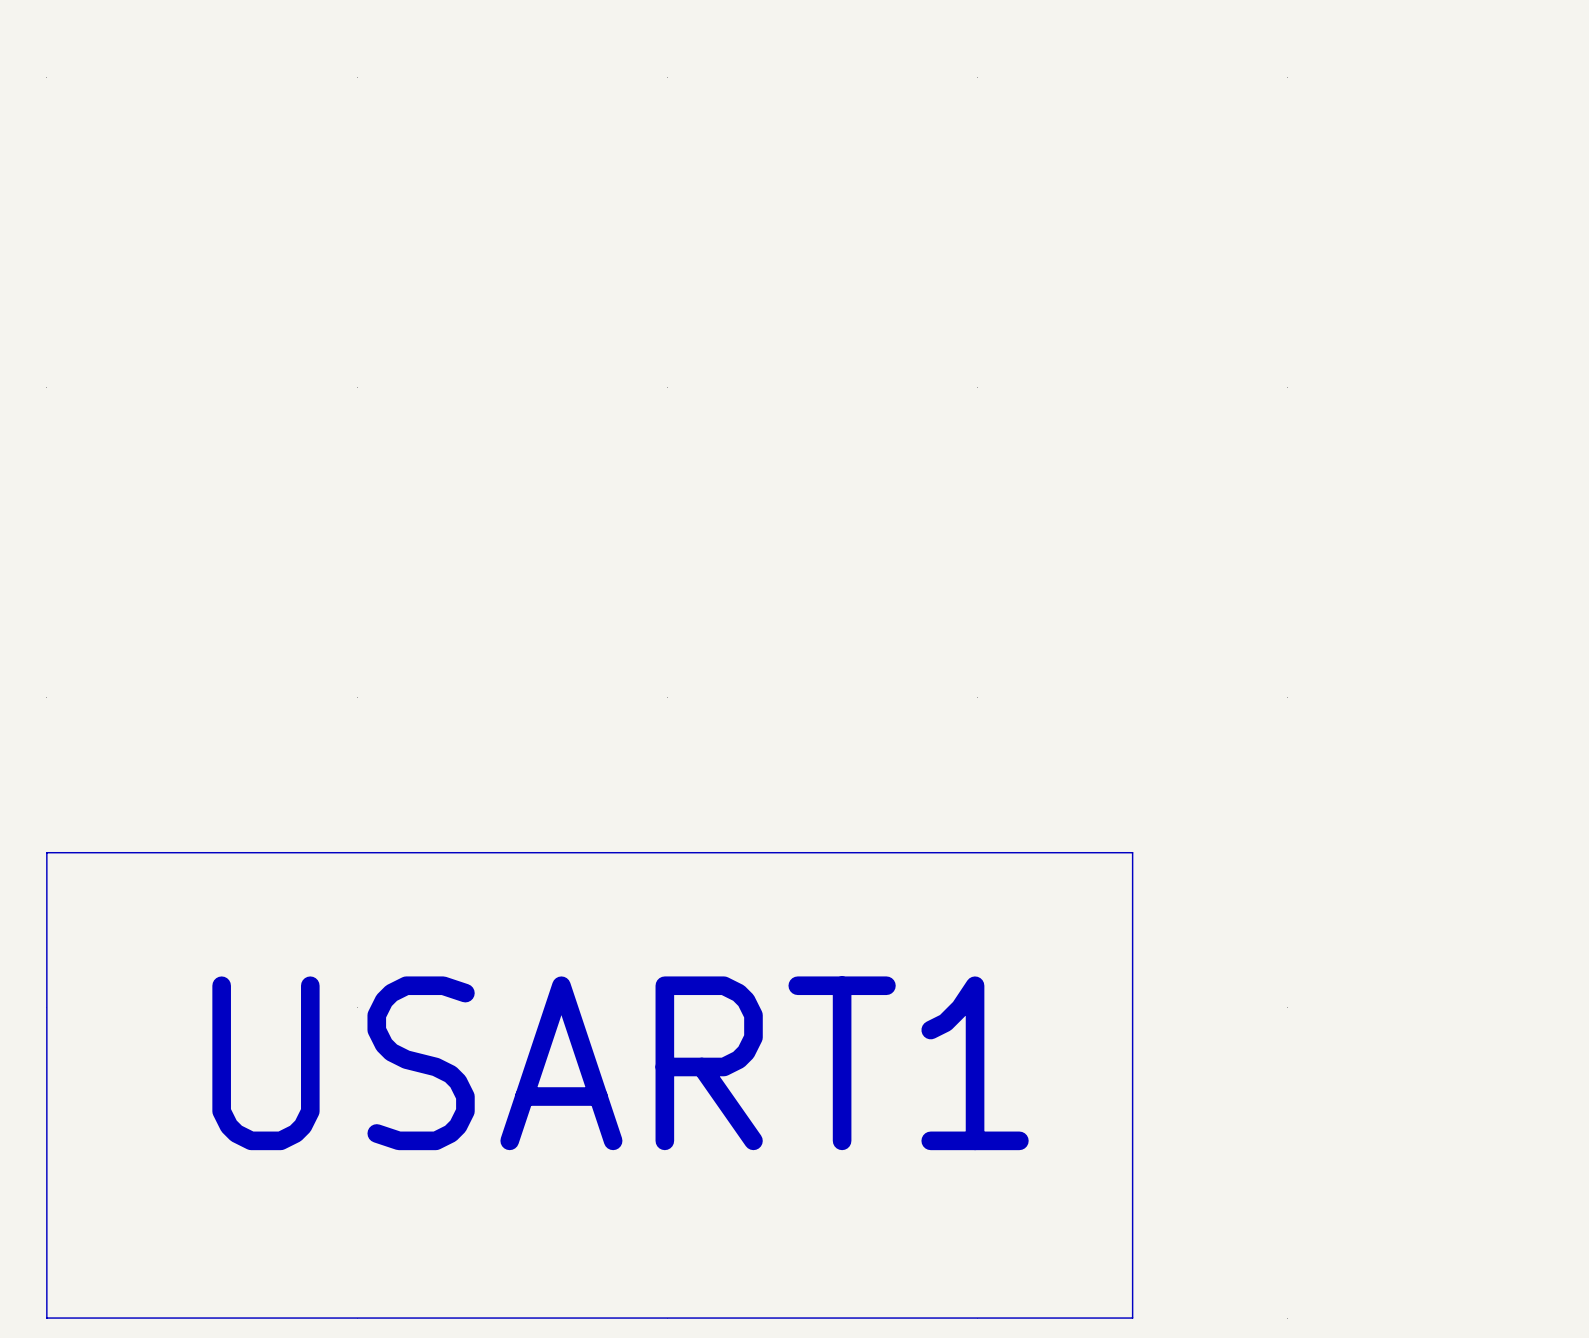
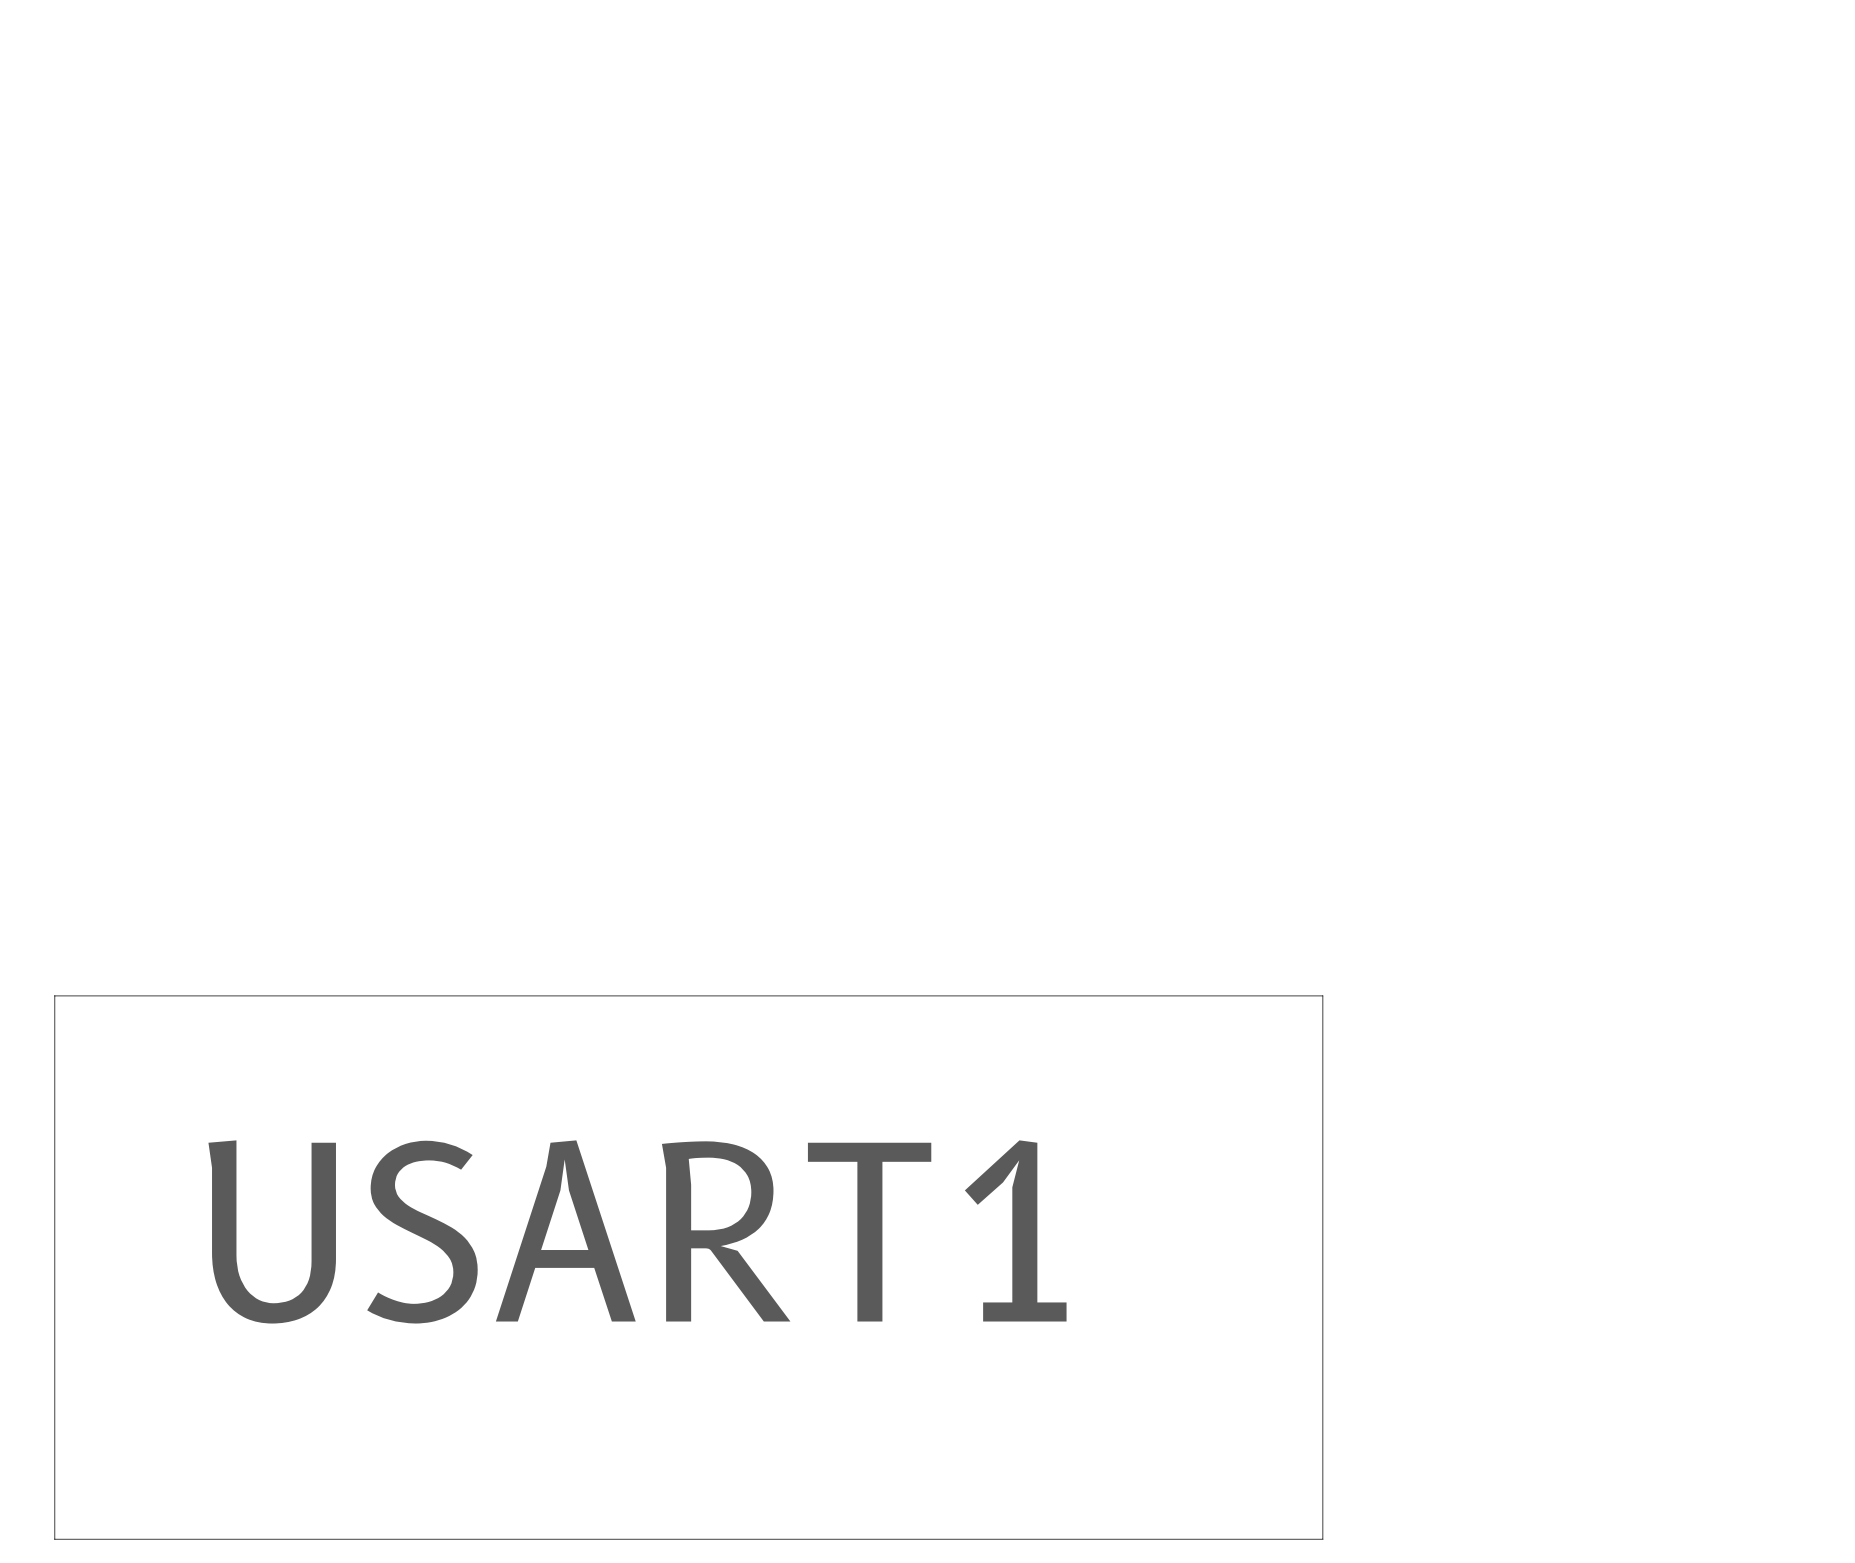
text position: USART1 (620, 1063) -> USART1 (637, 1231)

